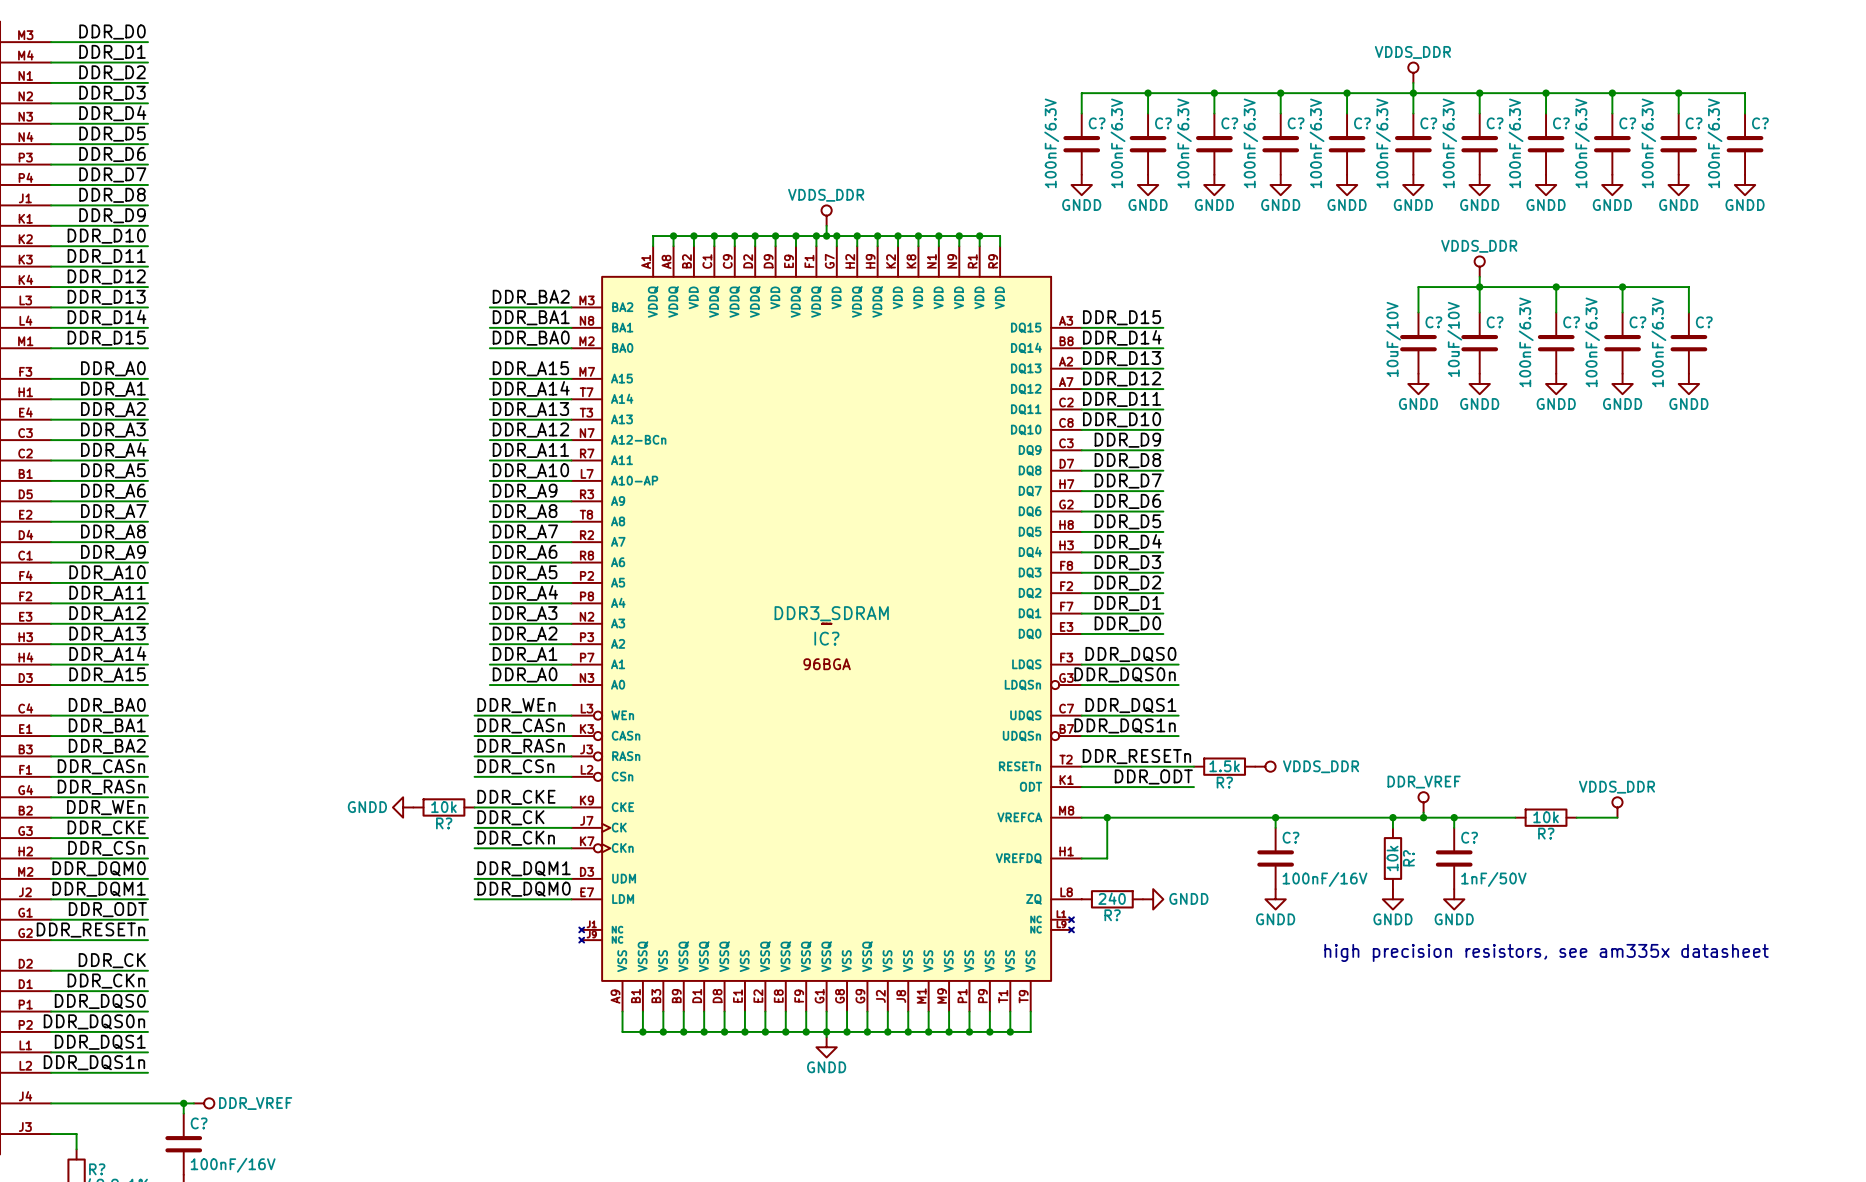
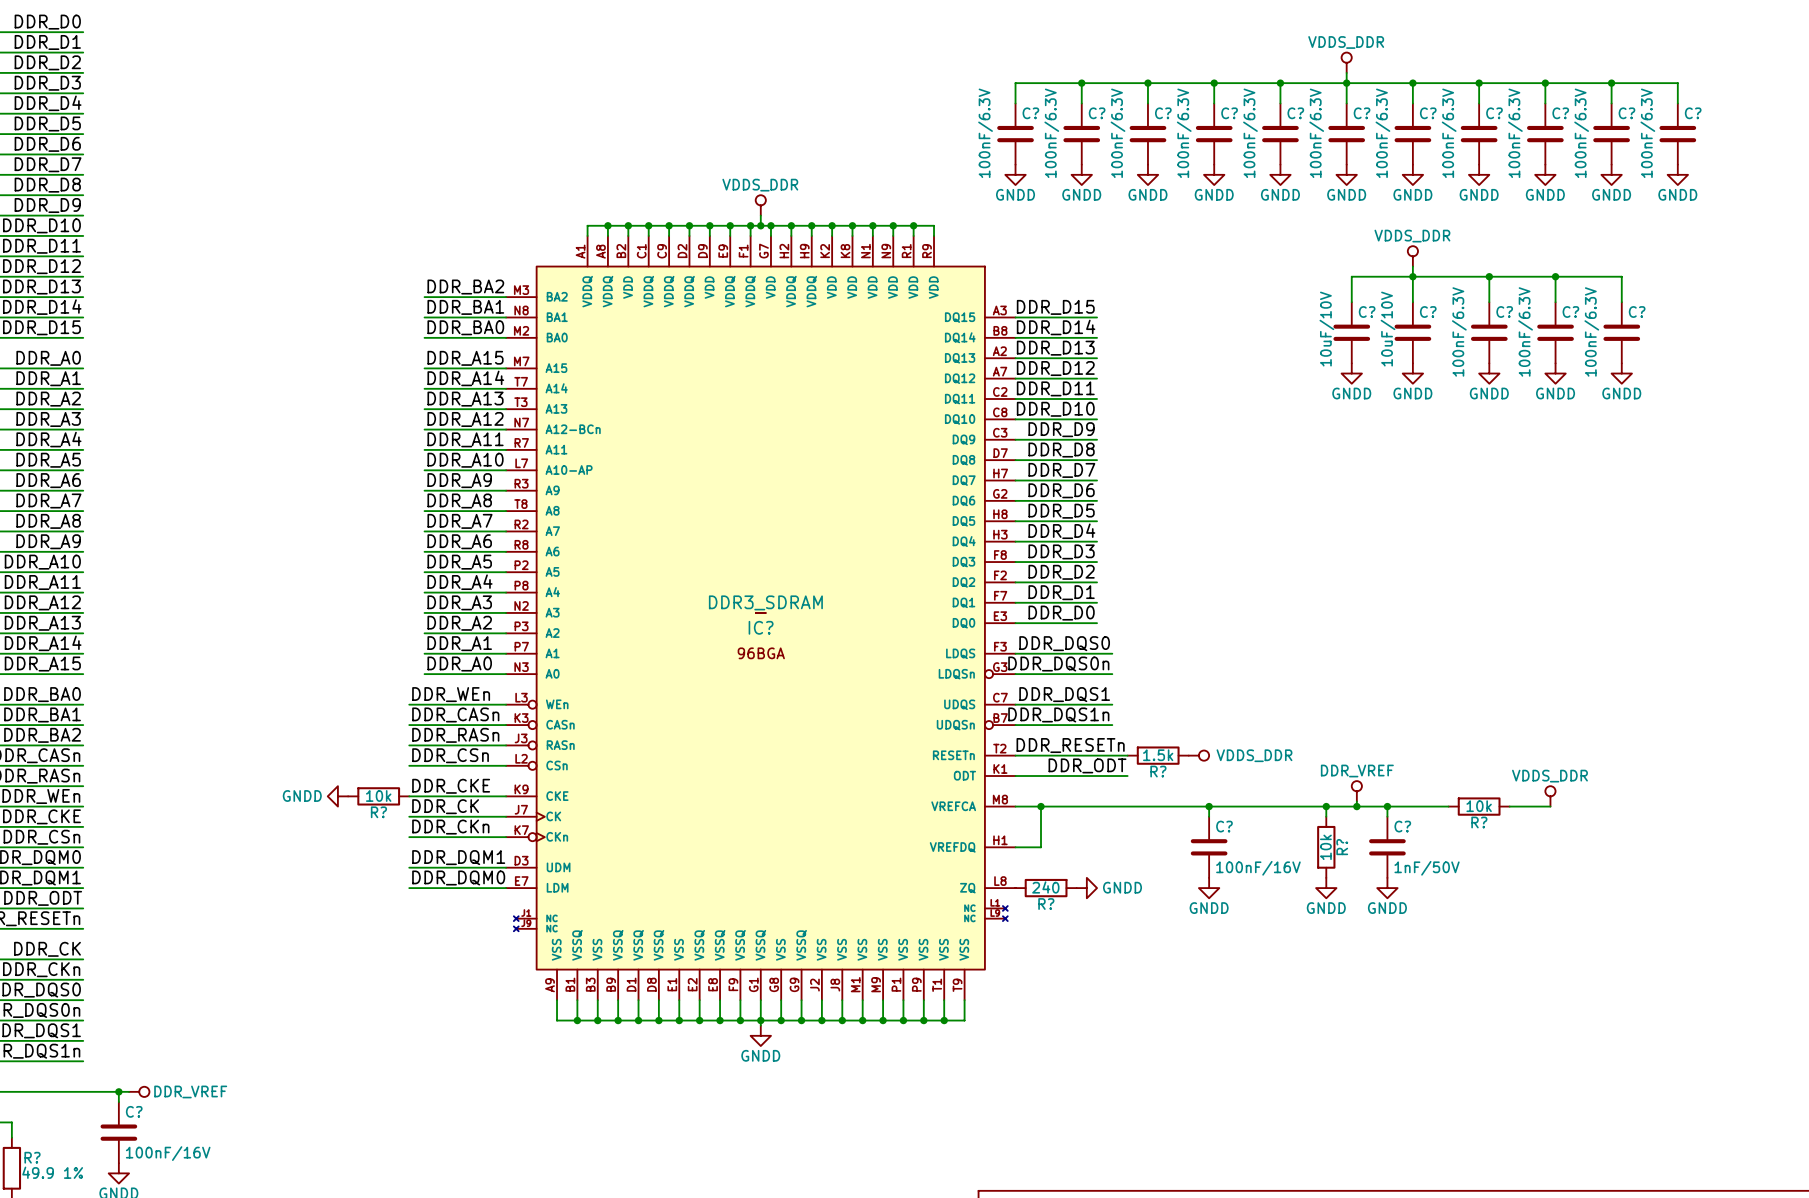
text: high precision resistors, see am335x datasheet (1546, 952) -> none

